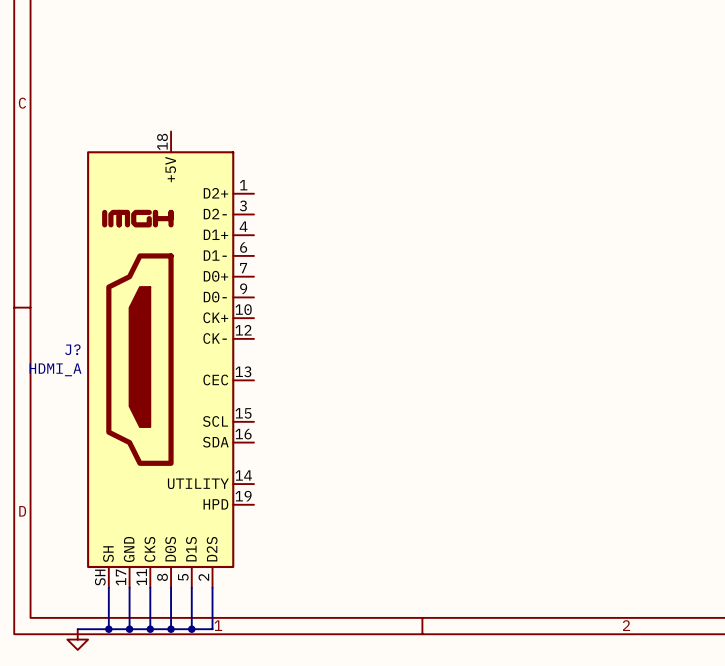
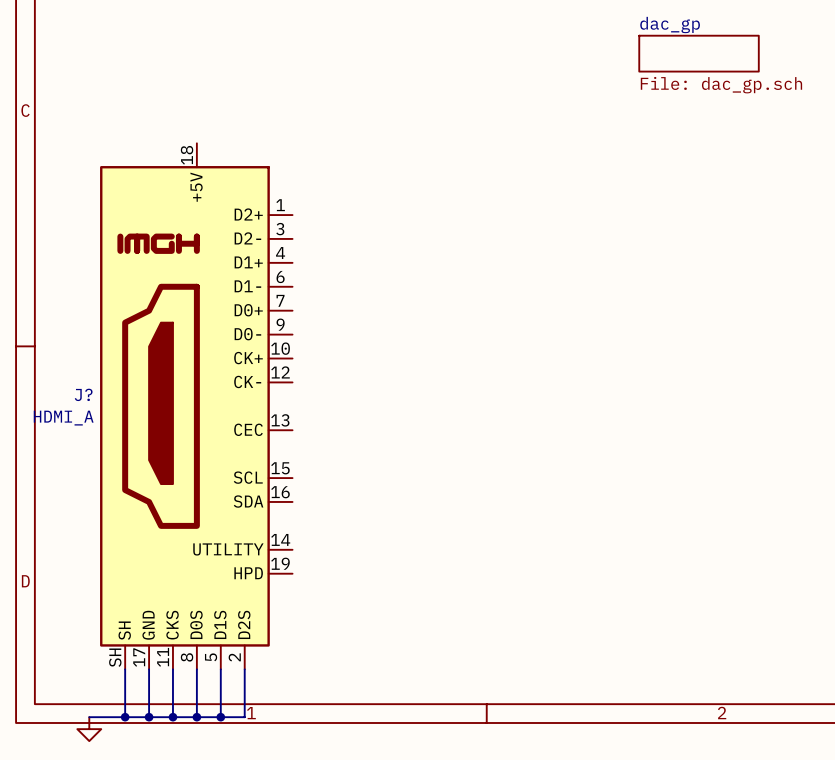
sheet dac_gp: none -> File: dac_gp.sch (699, 53)

